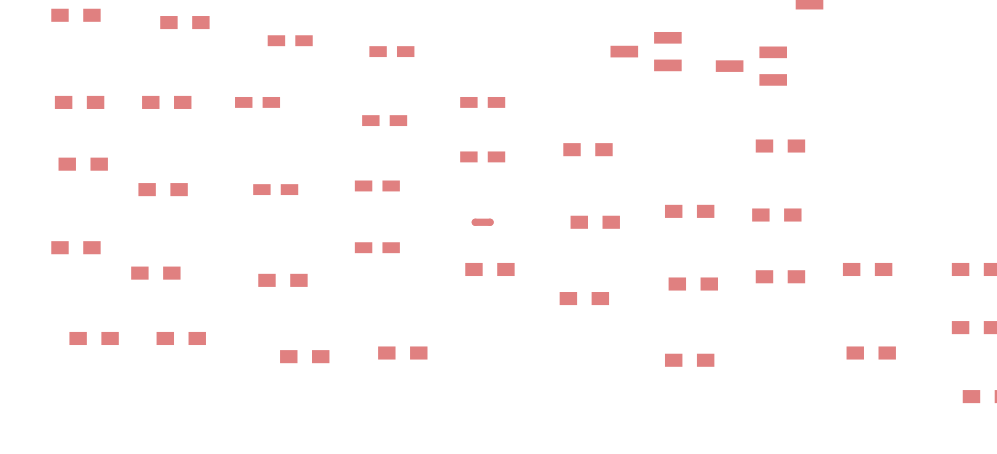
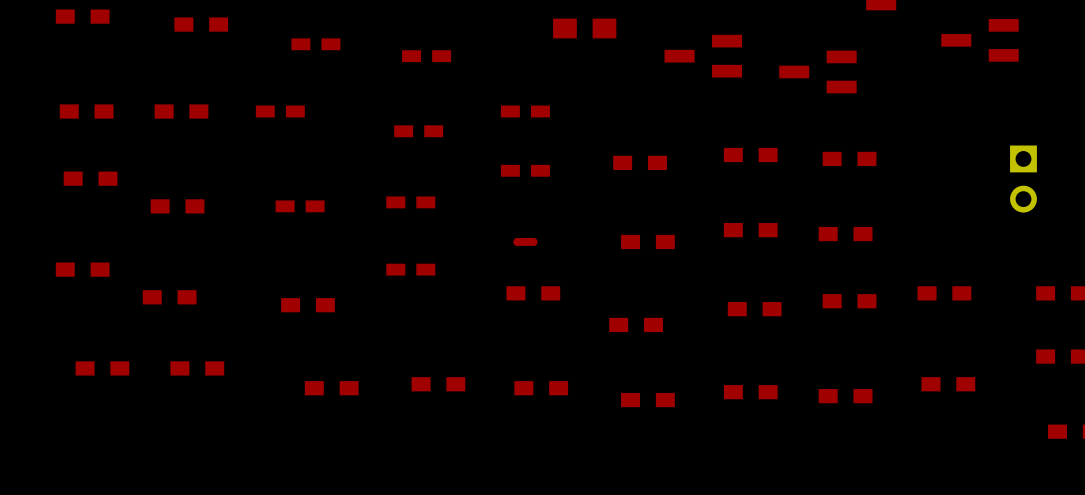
part: none -> (584, 28)
part: none -> (980, 40)
part: none -> (750, 154)
part: none -> (1023, 179)
part: none -> (541, 388)
part: none -> (845, 396)
part: none -> (647, 400)

